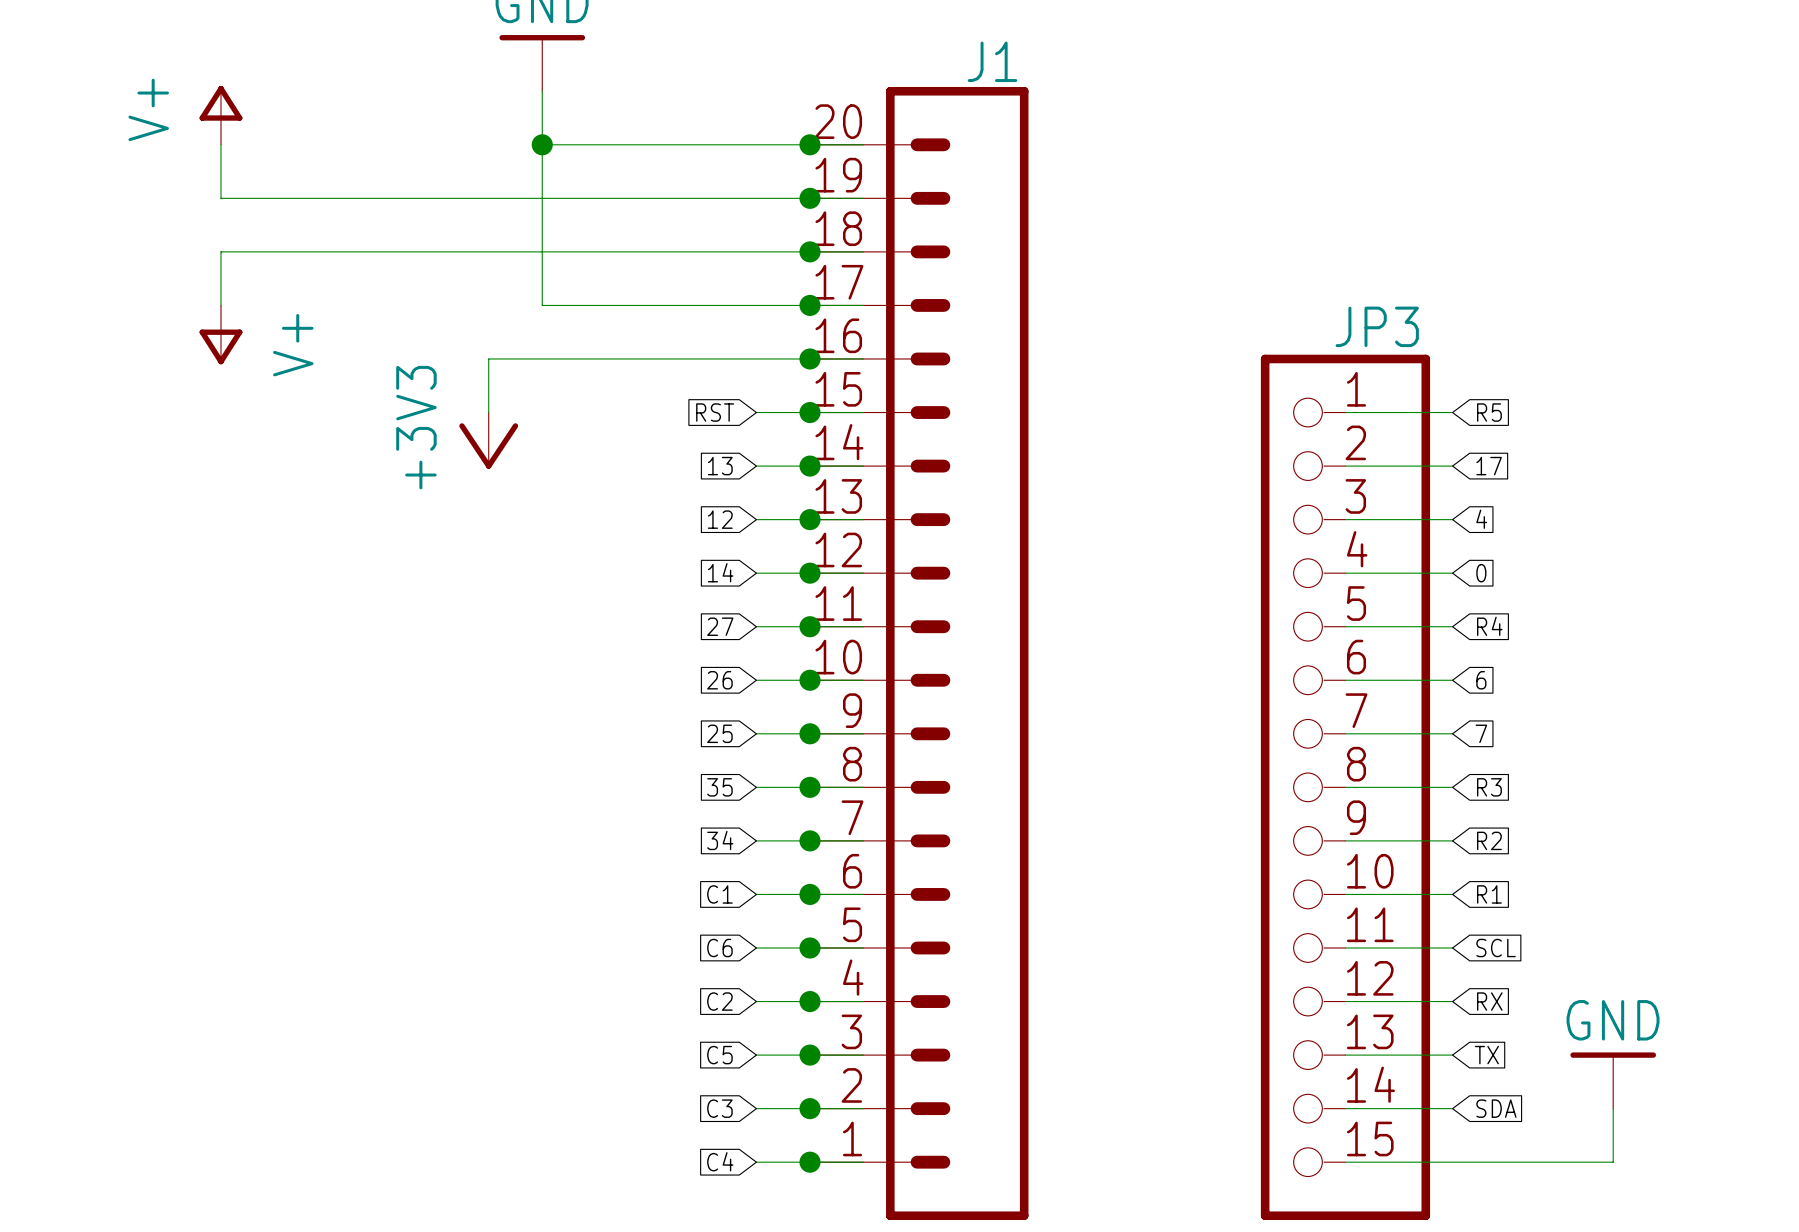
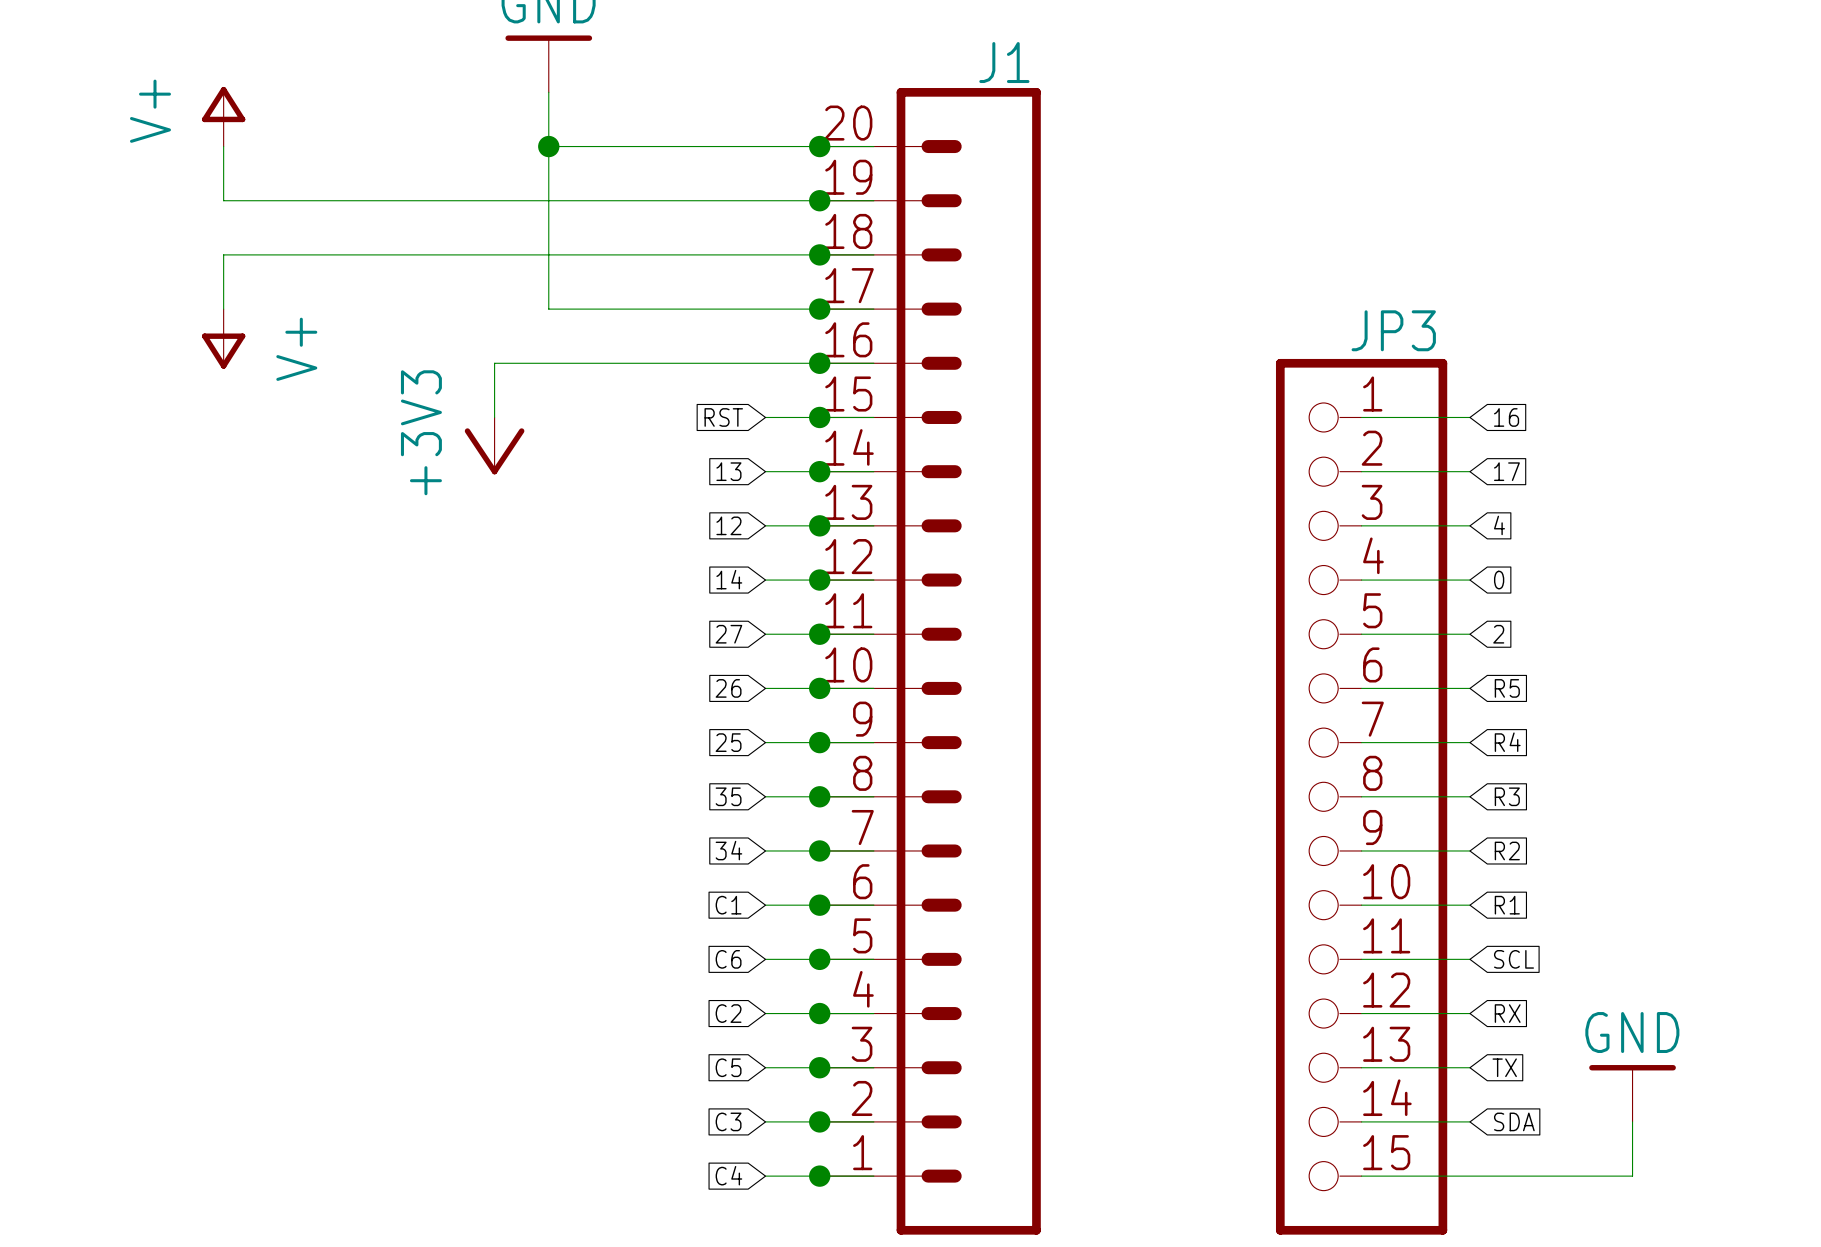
global label: R5 (1489, 412) -> 16 (1506, 417)
global label: R4 (1489, 626) -> 2 (1498, 634)
global label: 6 (1481, 680) -> R5 (1507, 688)
global label: 7 (1481, 733) -> R4 (1507, 742)

